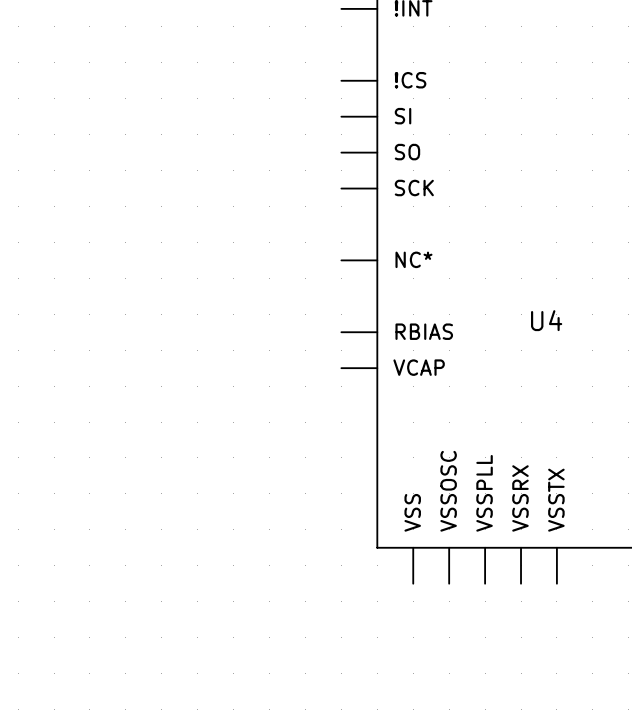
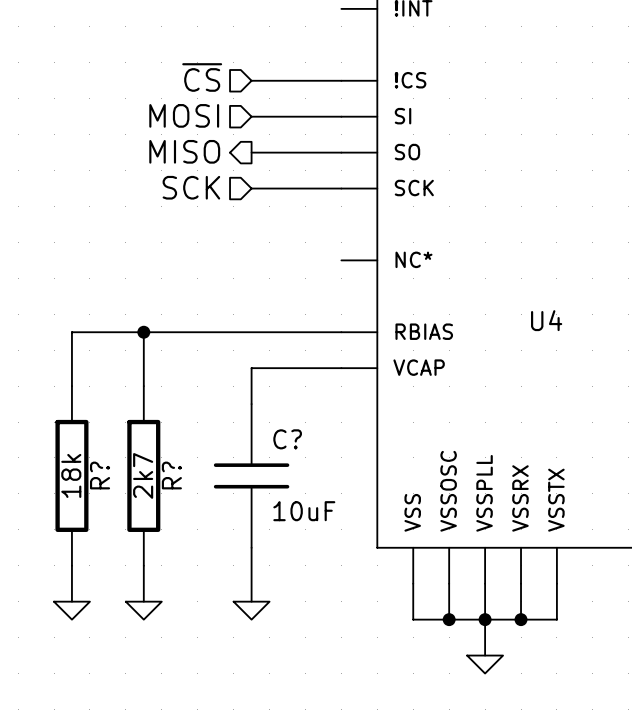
hierarchical label: none -> ~{CS} (202, 77)
wire: none -> (251, 80) (341, 80)
hierarchical label: none -> MOSI (184, 115)
wire: none -> (251, 116) (341, 116)
hierarchical label: none -> MISO (184, 151)
wire: none -> (251, 152) (341, 152)
hierarchical label: none -> SCK (191, 187)
wire: none -> (251, 188) (341, 188)
wire: none -> (143, 332) (143, 386)
junction: none -> (143, 332)
wire: none -> (341, 332) (71, 332) (71, 386)
wire: none -> (341, 368) (251, 368) (251, 404)
R?: none -> 18k (71, 475)
R?: none -> 2k7 (143, 475)
C?: none -> 10uF (251, 475)
wire: none -> (251, 547) (251, 601)
wire: none -> (71, 565) (71, 601)
wire: none -> (143, 565) (143, 601)
wire: none -> (413, 583) (413, 619) (556, 619) (556, 583)
wire: none -> (449, 583) (449, 619)
wire: none -> (485, 583) (485, 655)
wire: none -> (521, 583) (521, 619)
power symbol: none -> (71, 610)
power symbol: none -> (143, 610)
power symbol: none -> (251, 610)
junction: none -> (449, 619)
junction: none -> (485, 619)
junction: none -> (521, 619)
power symbol: none -> (485, 664)

